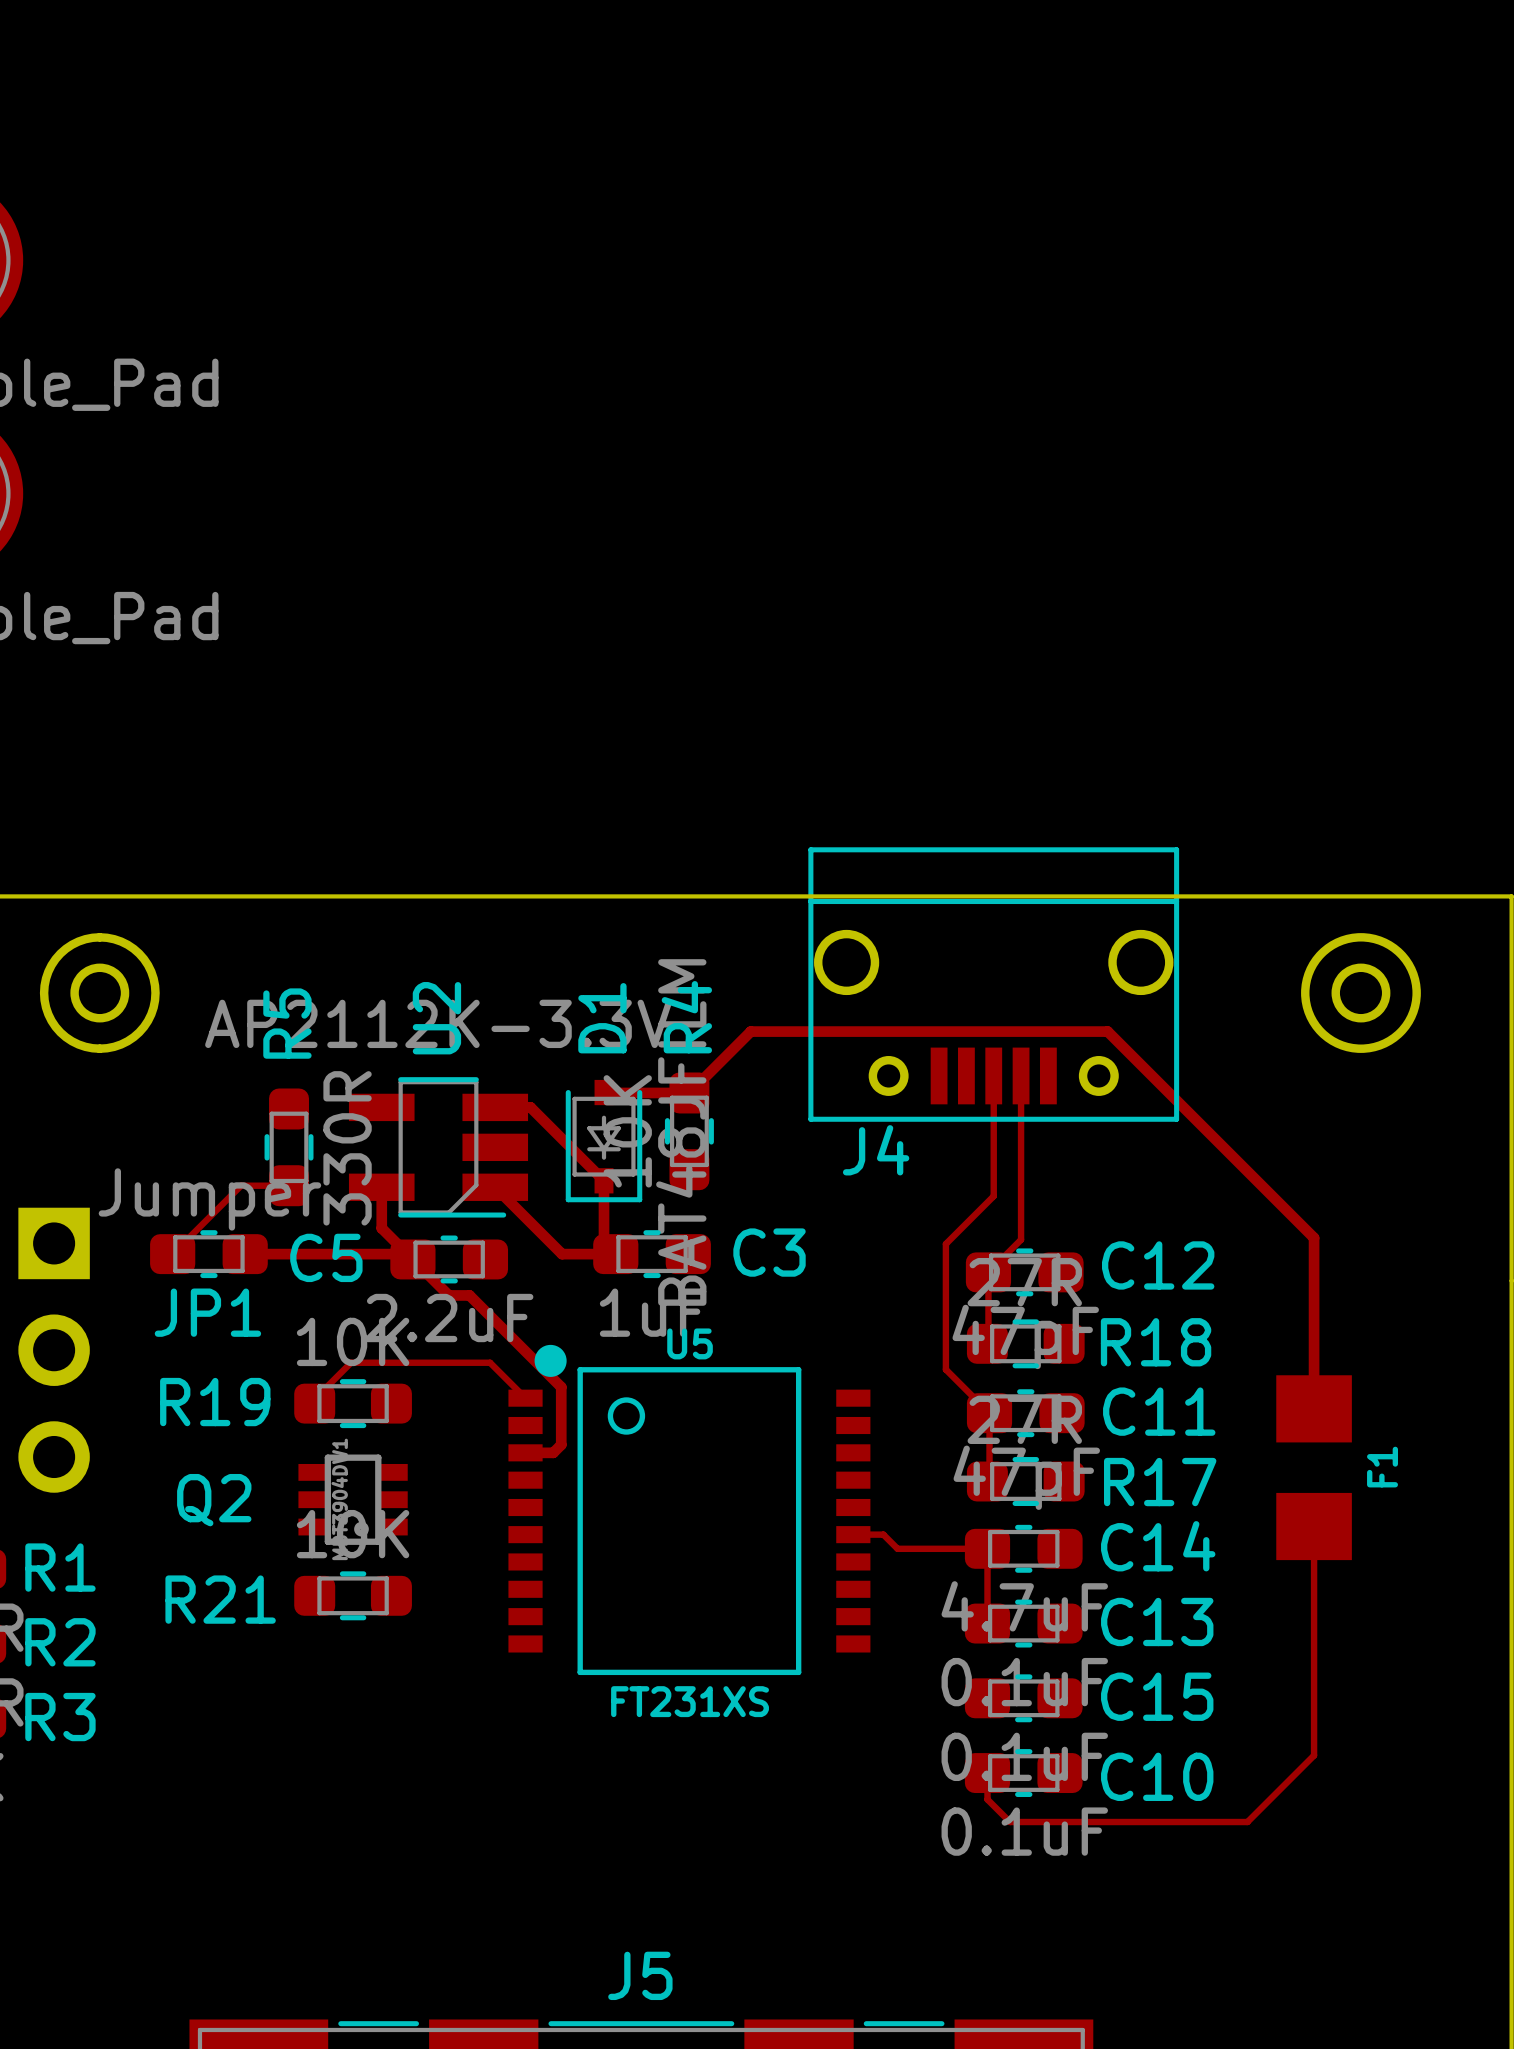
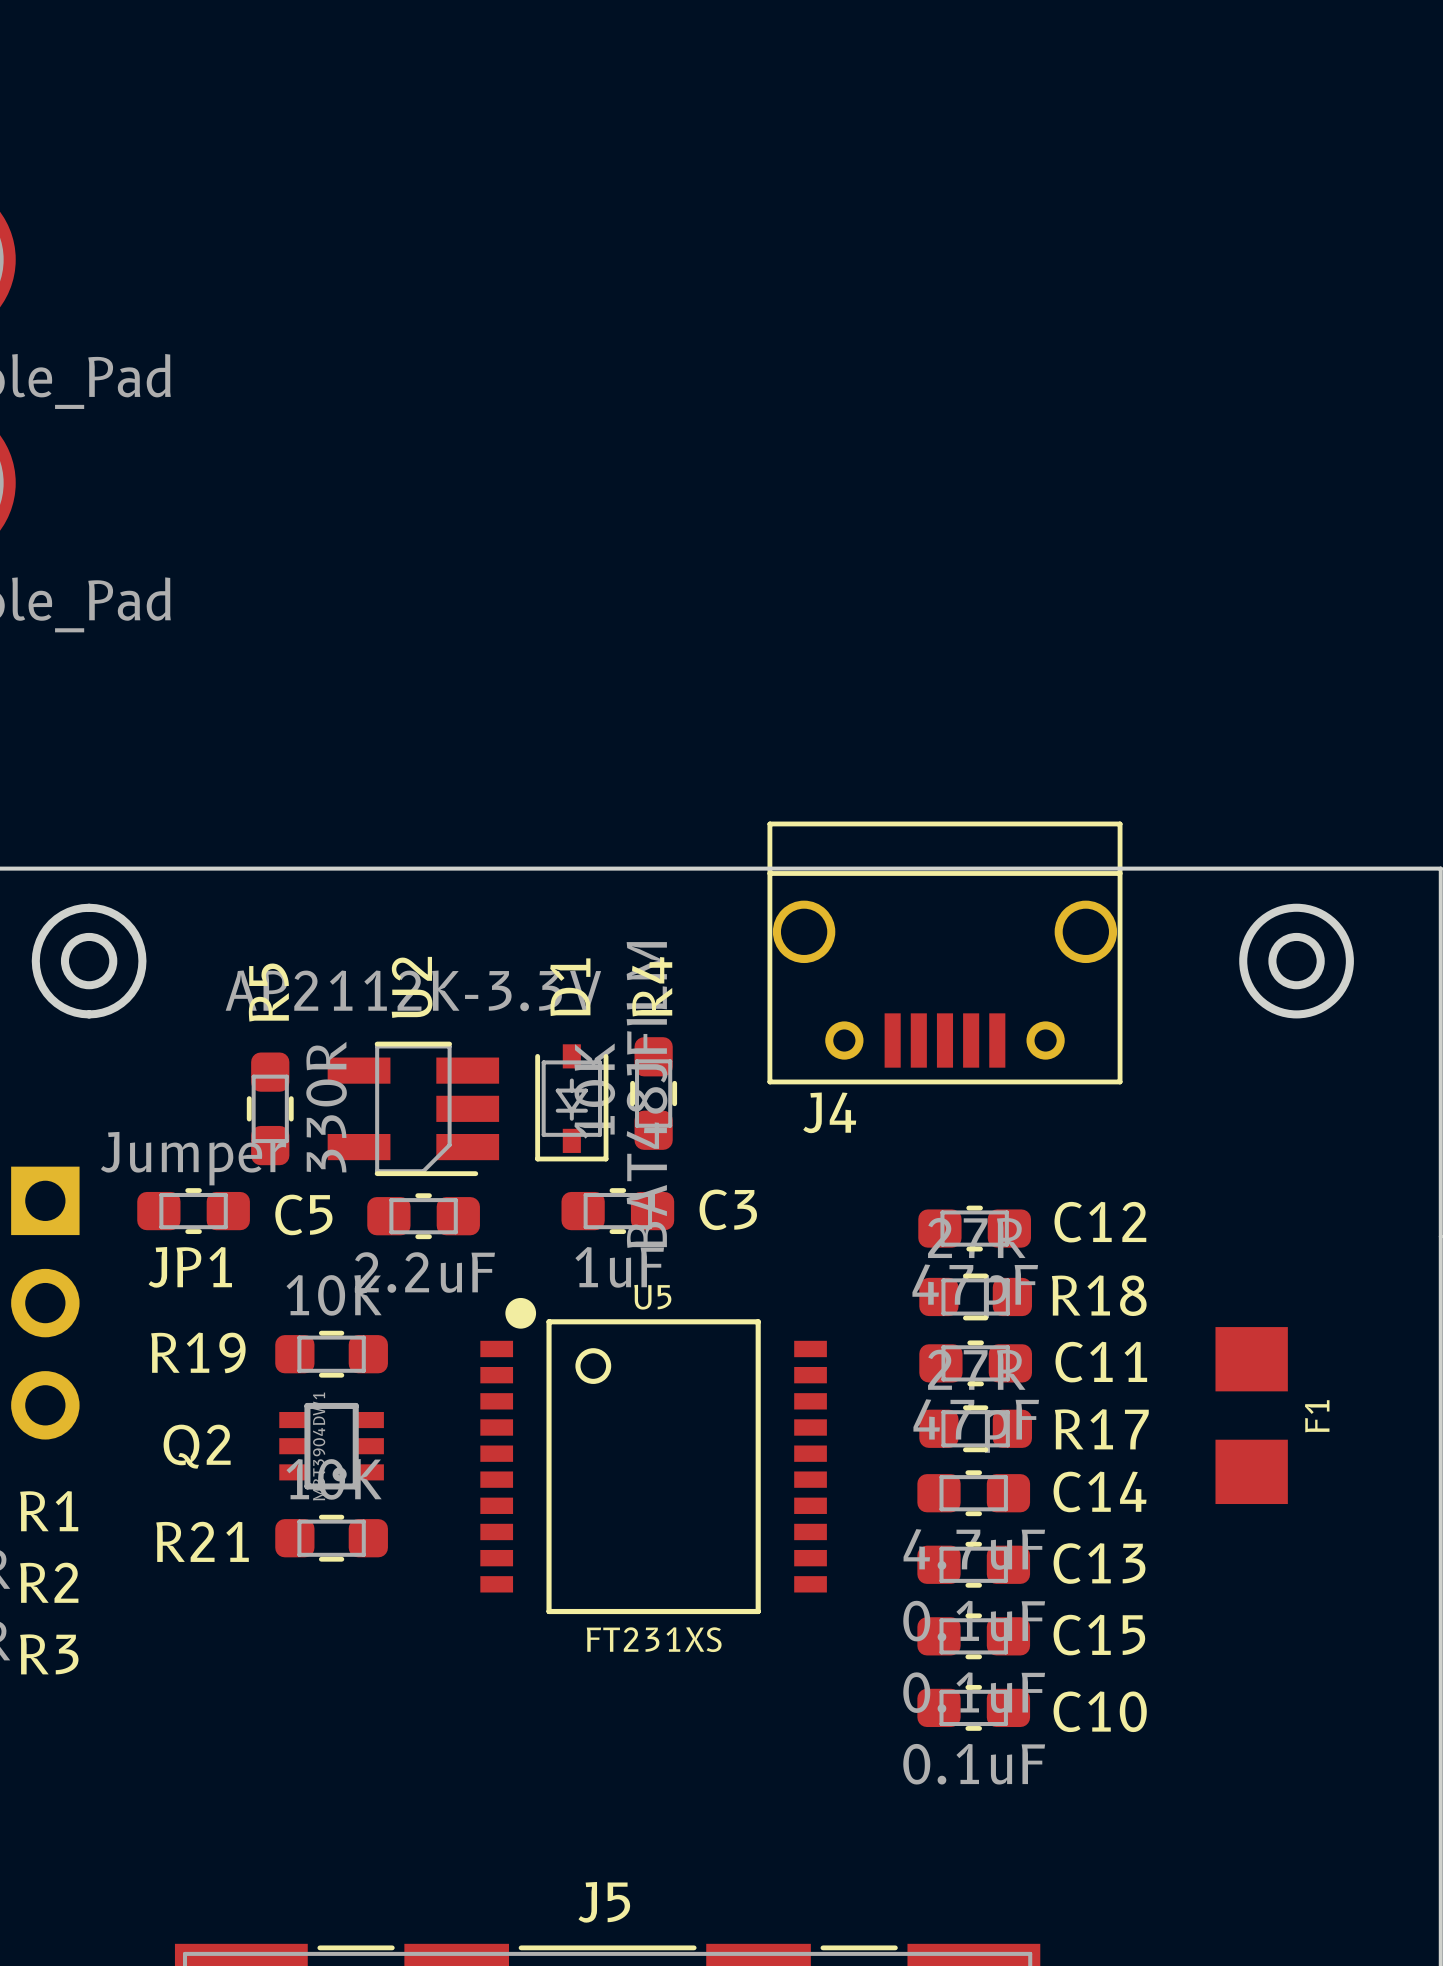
top track: (993, 1075) (993, 1196) (945, 1243) (945, 1369) (989, 1413) (989, 1479) (987, 1481) -> none
top track: (1021, 1075) (1021, 1239) (988, 1272) (987, 1343) -> none
top track: (604, 1092) (689, 1092) (750, 1031) (1107, 1031) (1314, 1237) (1314, 1408) -> none
top track: (495, 1107) (530, 1107) (604, 1180) (604, 1242) (615, 1254) (562, 1254) (495, 1187) -> none
top track: (289, 1185) (241, 1185) (172, 1254) -> none
top track: (381, 1187) (381, 1228) (448, 1295) (469, 1295) (561, 1387) (561, 1444) (553, 1452) (525, 1452) -> none
top track: (245, 1254) (407, 1254) -> none
top track: (525, 1398) (490, 1362) (351, 1362) (314, 1399) (314, 1403) -> none
top track: (1314, 1526) (1314, 1755) (1247, 1822) (1010, 1822) (987, 1799) (987, 1773) -> none
top track: (853, 1534) (883, 1534) (897, 1548) (987, 1548) (987, 1623) -> none

